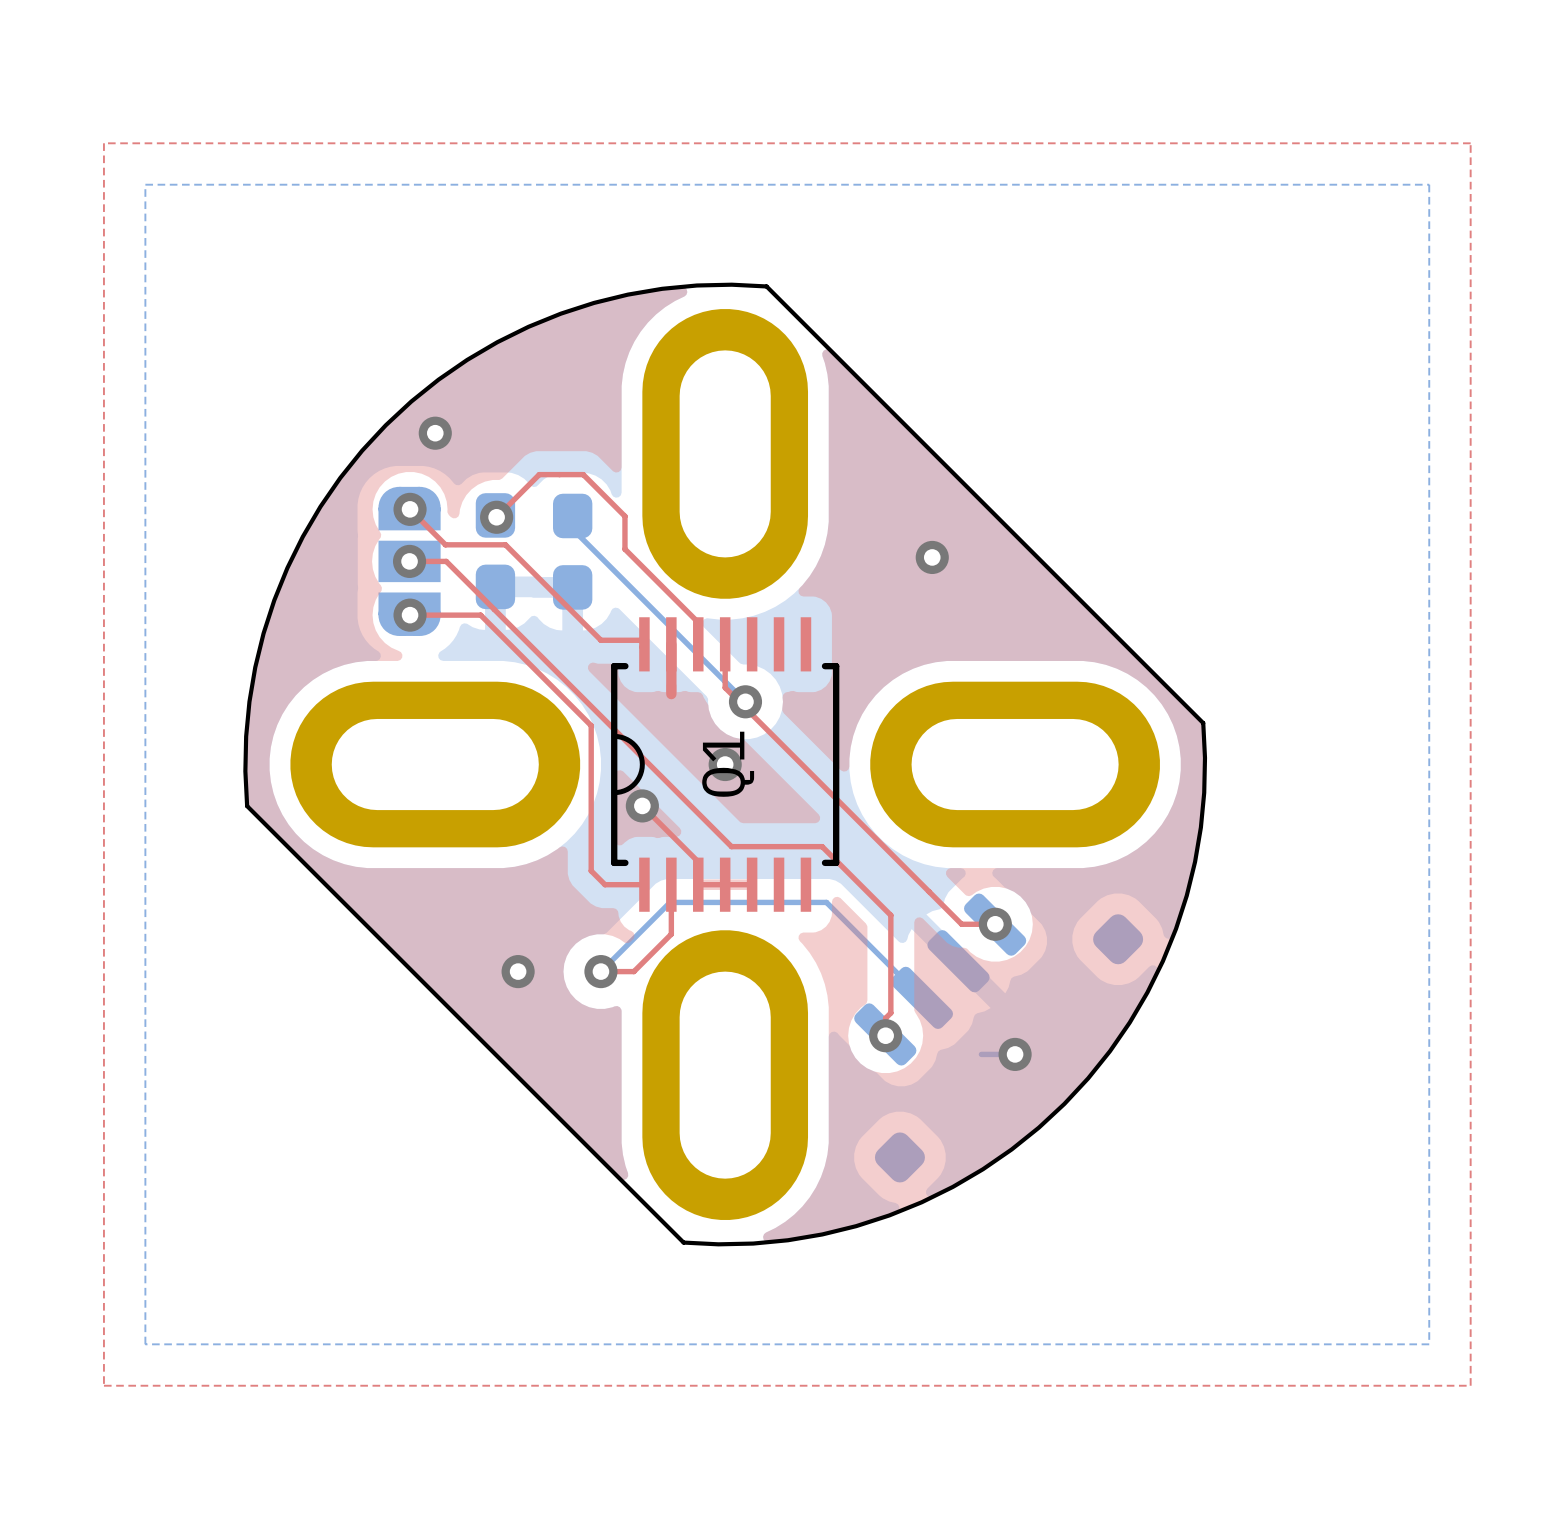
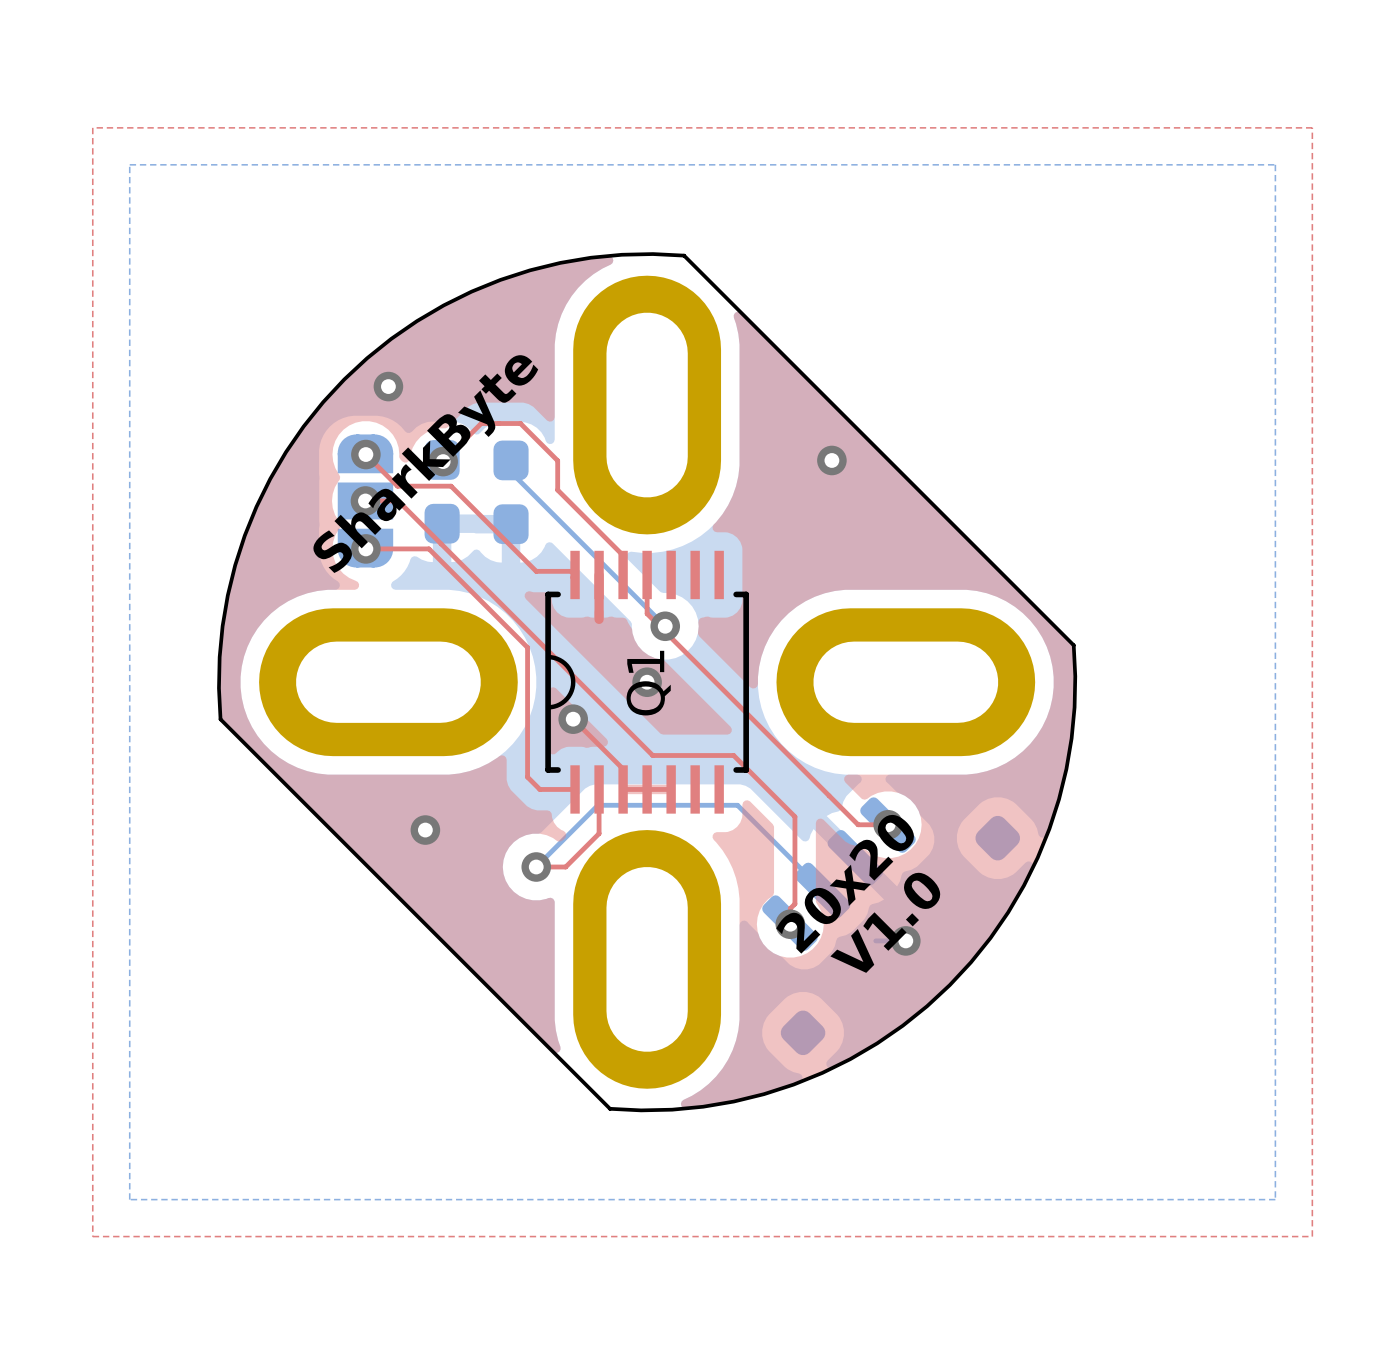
text: none -> SharkByte (425, 464)
via position: (932, 557) -> (831, 460)
via position: (518, 971) -> (425, 830)
text: none -> 20x20 (845, 883)
text: none -> V1.0 (885, 922)

